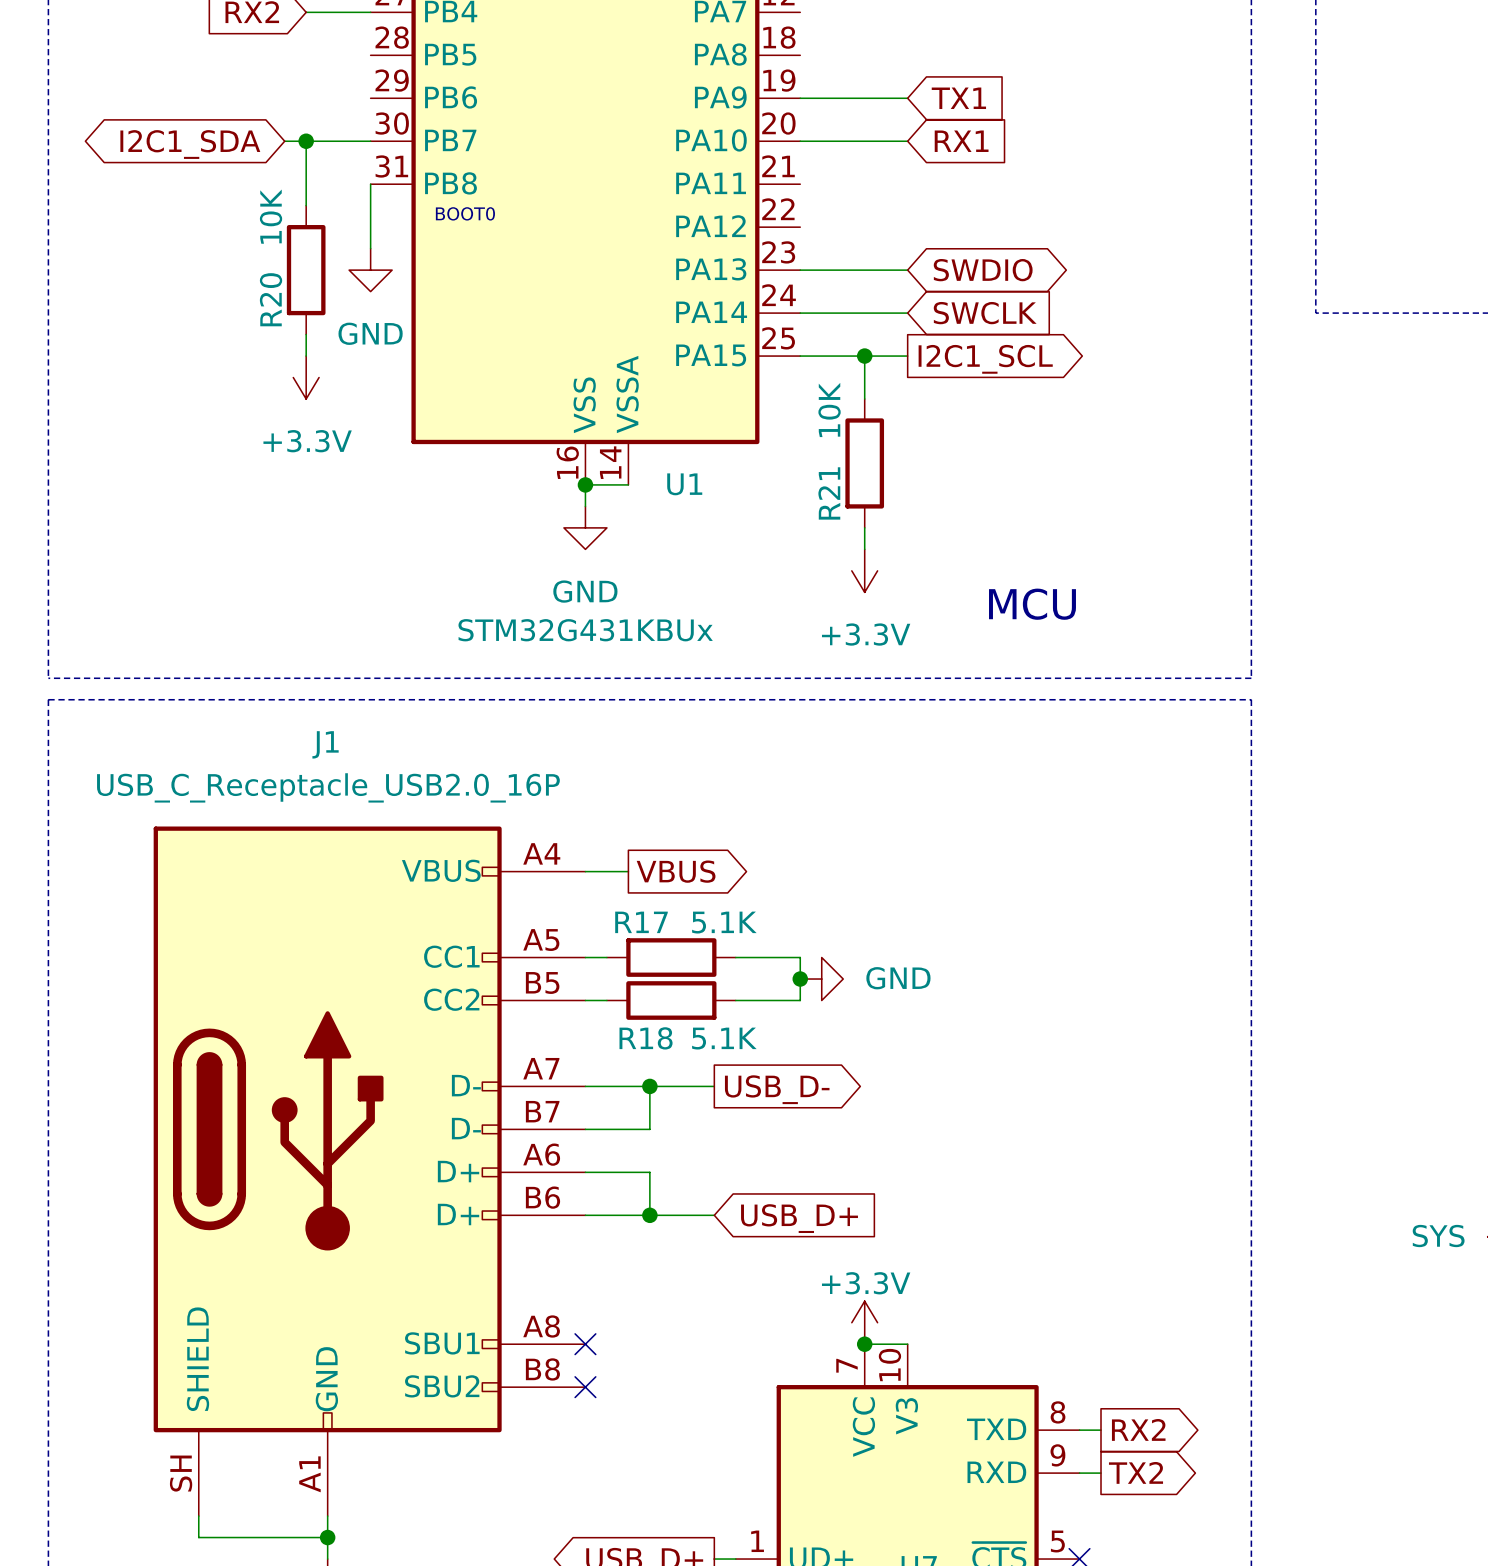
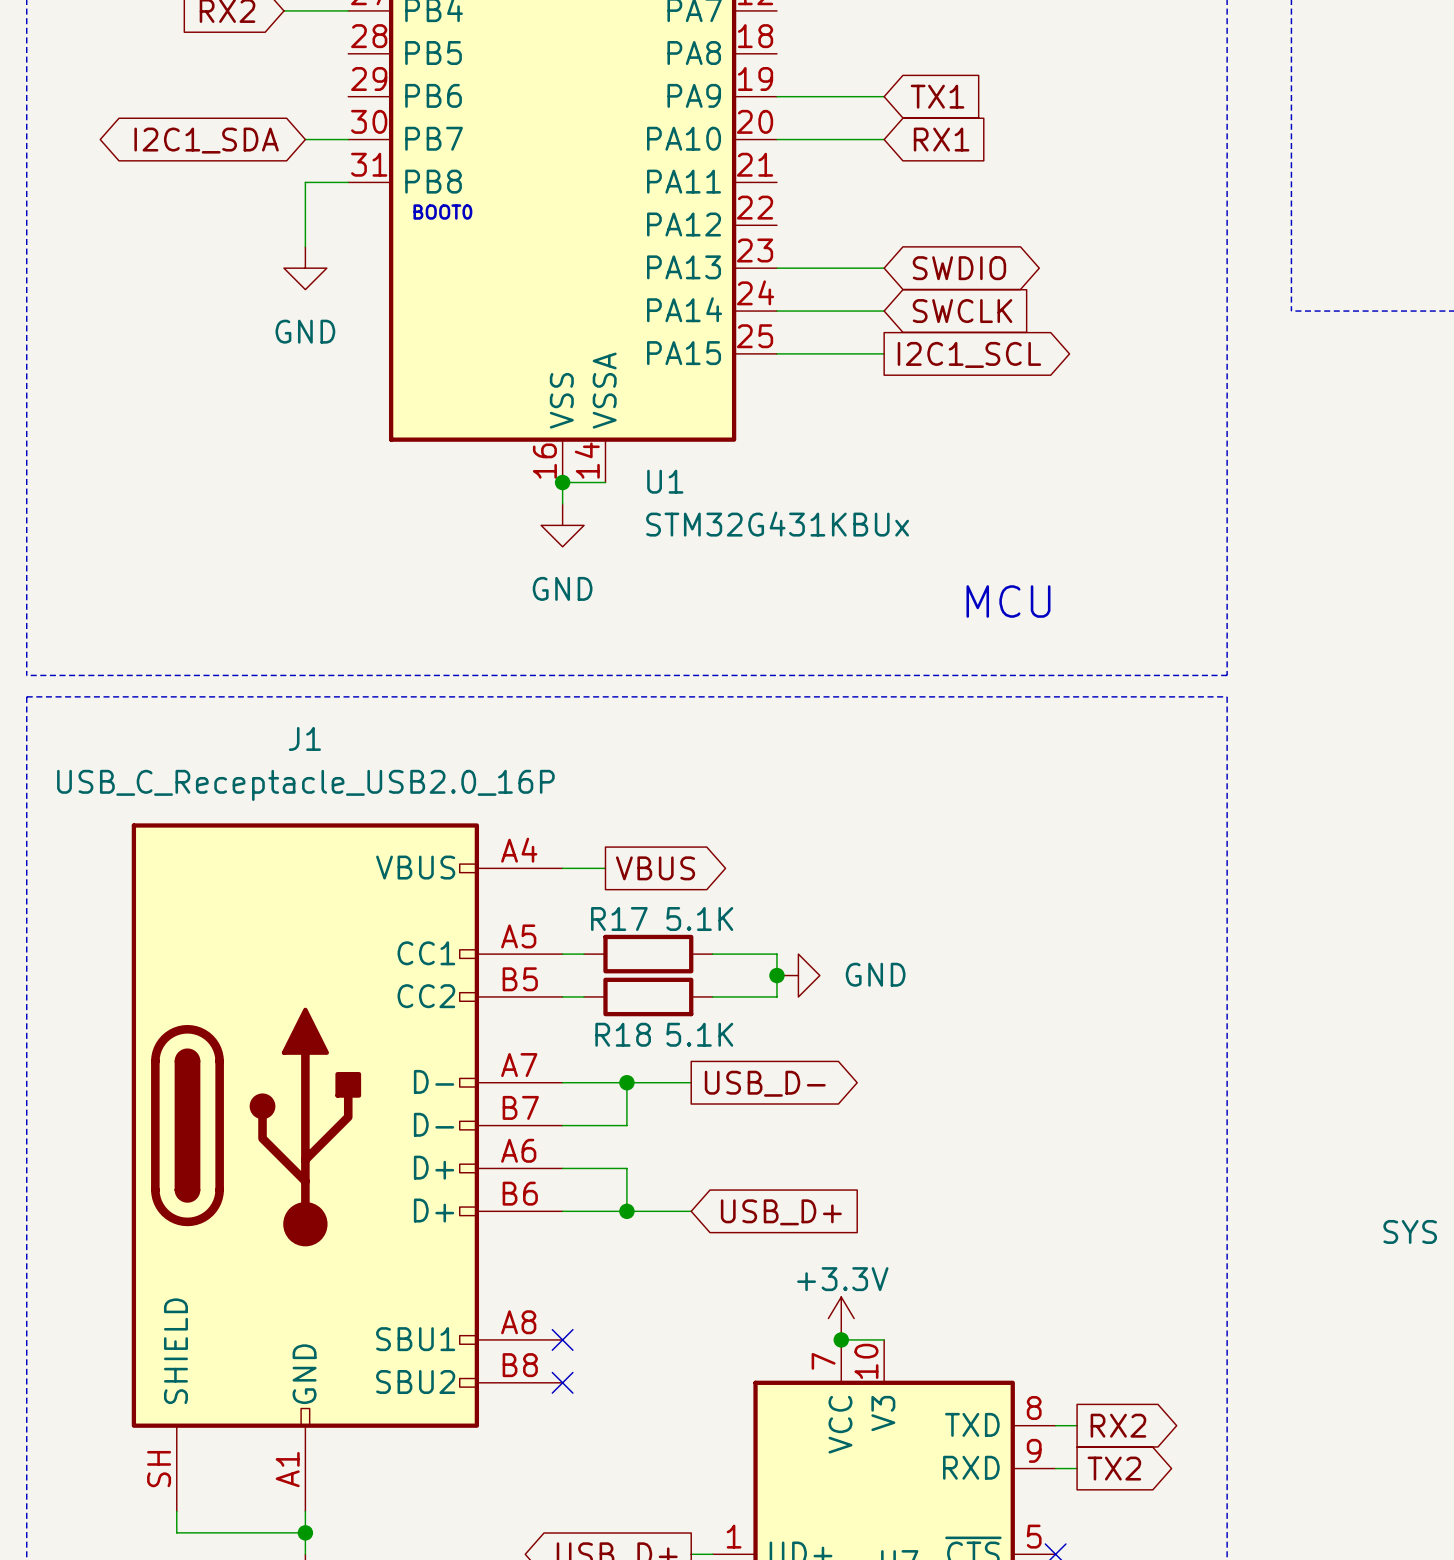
wire: (284, 141) (327, 141) -> none
wire: (306, 141) (306, 205) -> none
junction: (306, 141) -> none
global label position: I2C1_SDA (190, 144) -> I2C1_SDA (206, 140)
wire: (370, 184) (370, 248) -> (348, 182) (305, 182) (305, 246)
R20: 10K (306, 270) -> none
power symbol position: GND (370, 270) -> GND (305, 268)
wire: (306, 334) (306, 356) -> none
wire: (864, 356) (864, 399) -> none
junction: (864, 356) -> none
power symbol: +3.3V (306, 377) -> none
R21: 10K (864, 463) -> none
wire: (864, 527) (864, 549) -> none
power symbol: +3.3V (864, 570) -> none
U1 value position: STM32G431KBUx (585, 630) -> STM32G431KBUx (777, 524)

